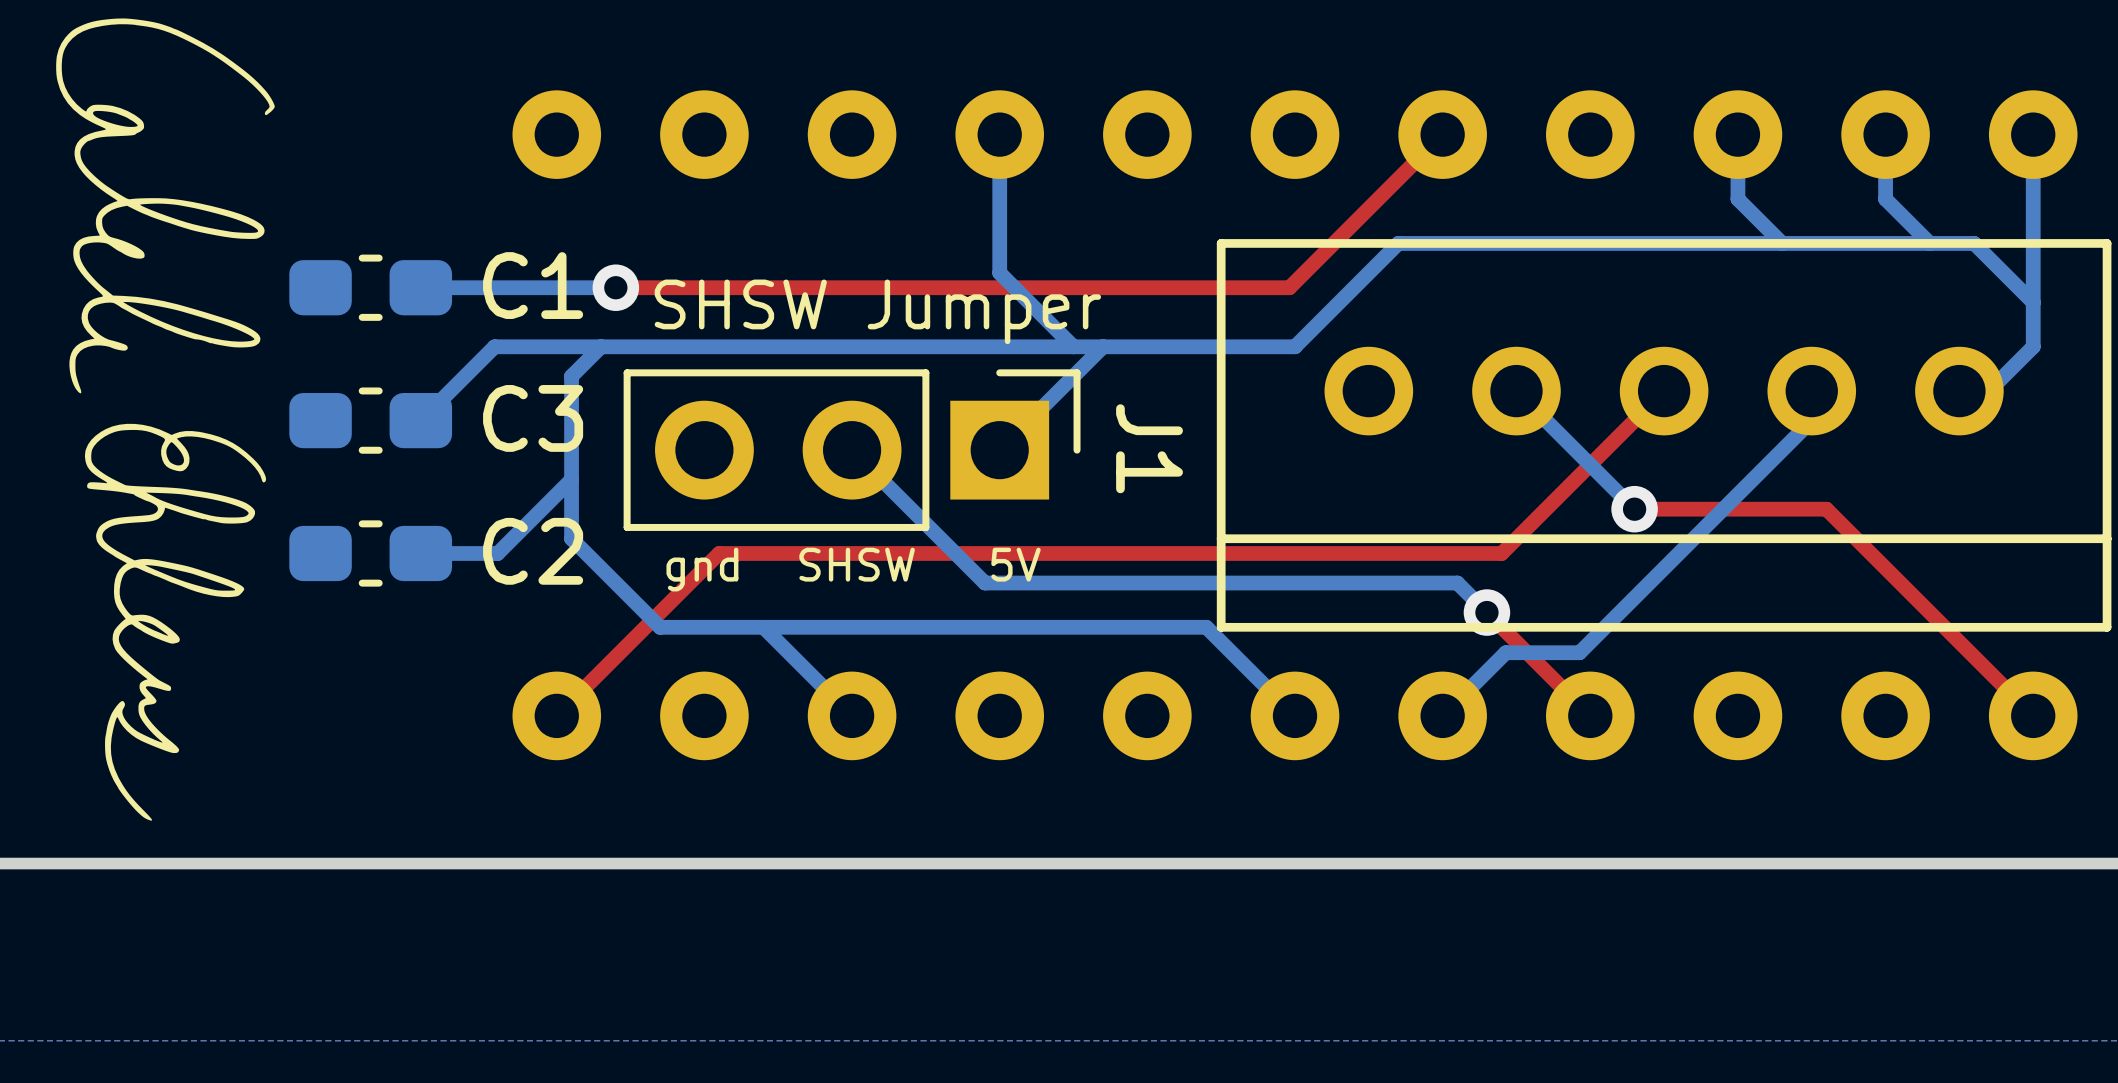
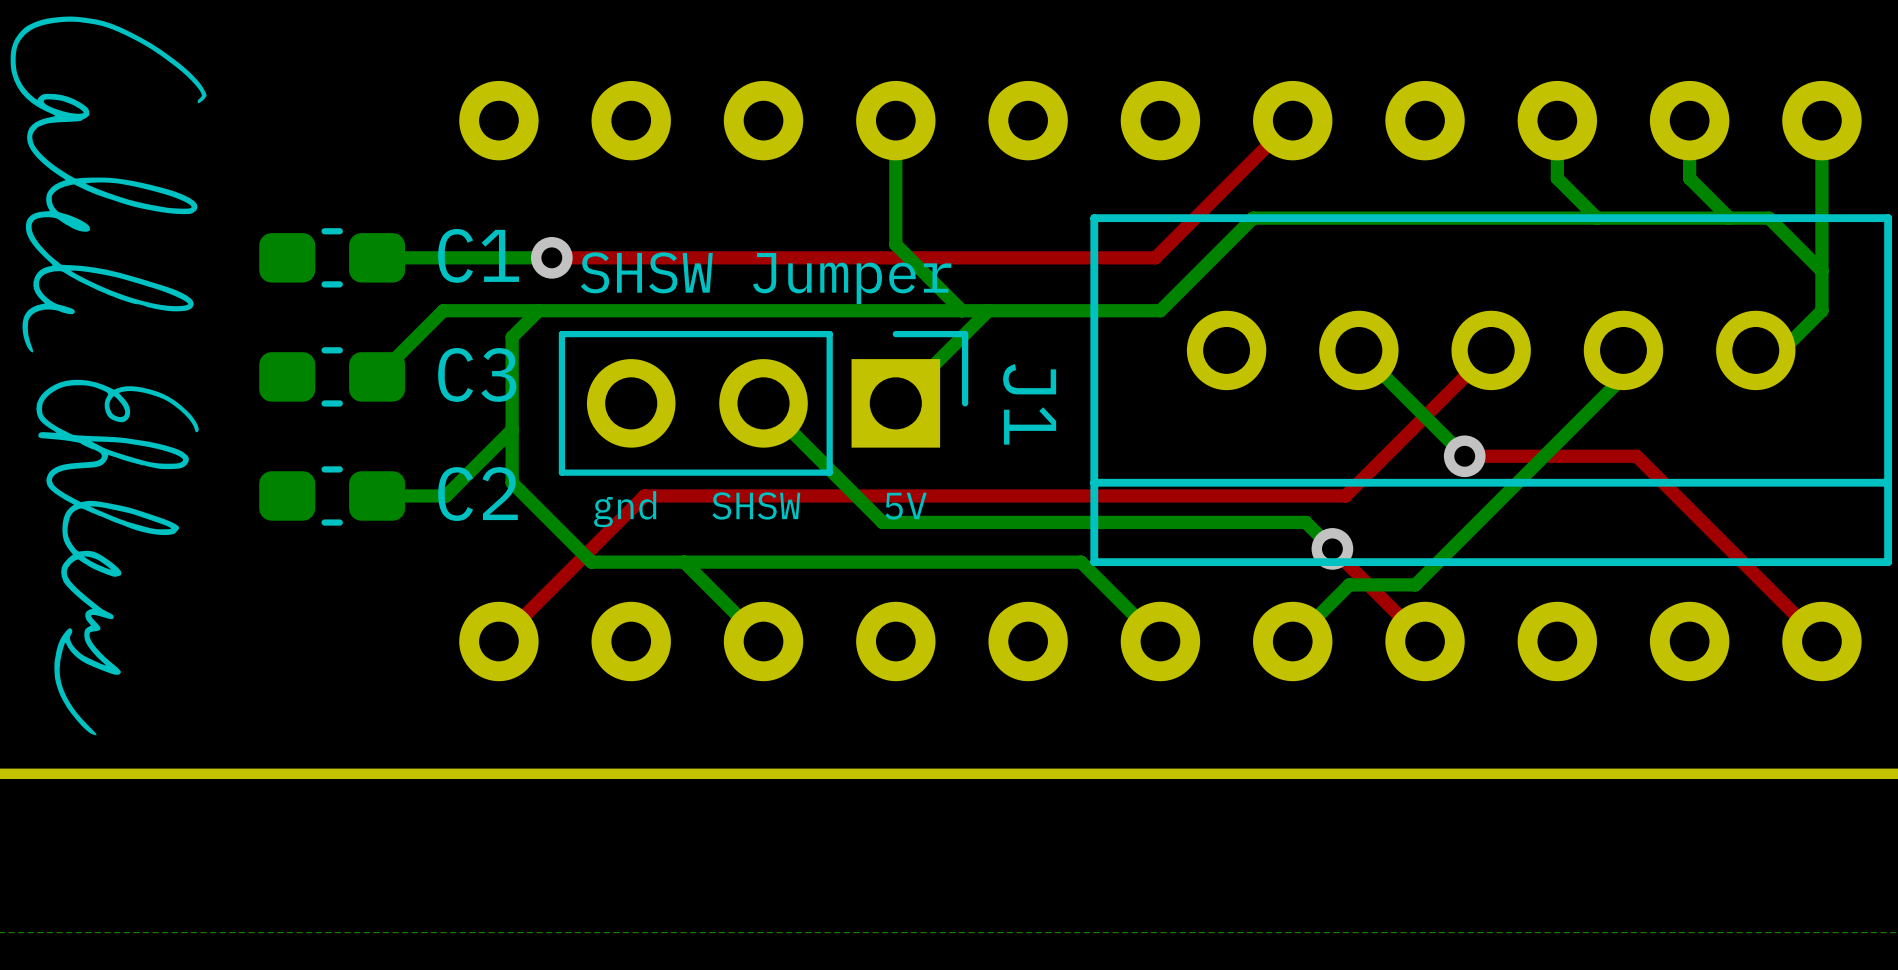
drawing position: (165, 419) -> (108, 375)

